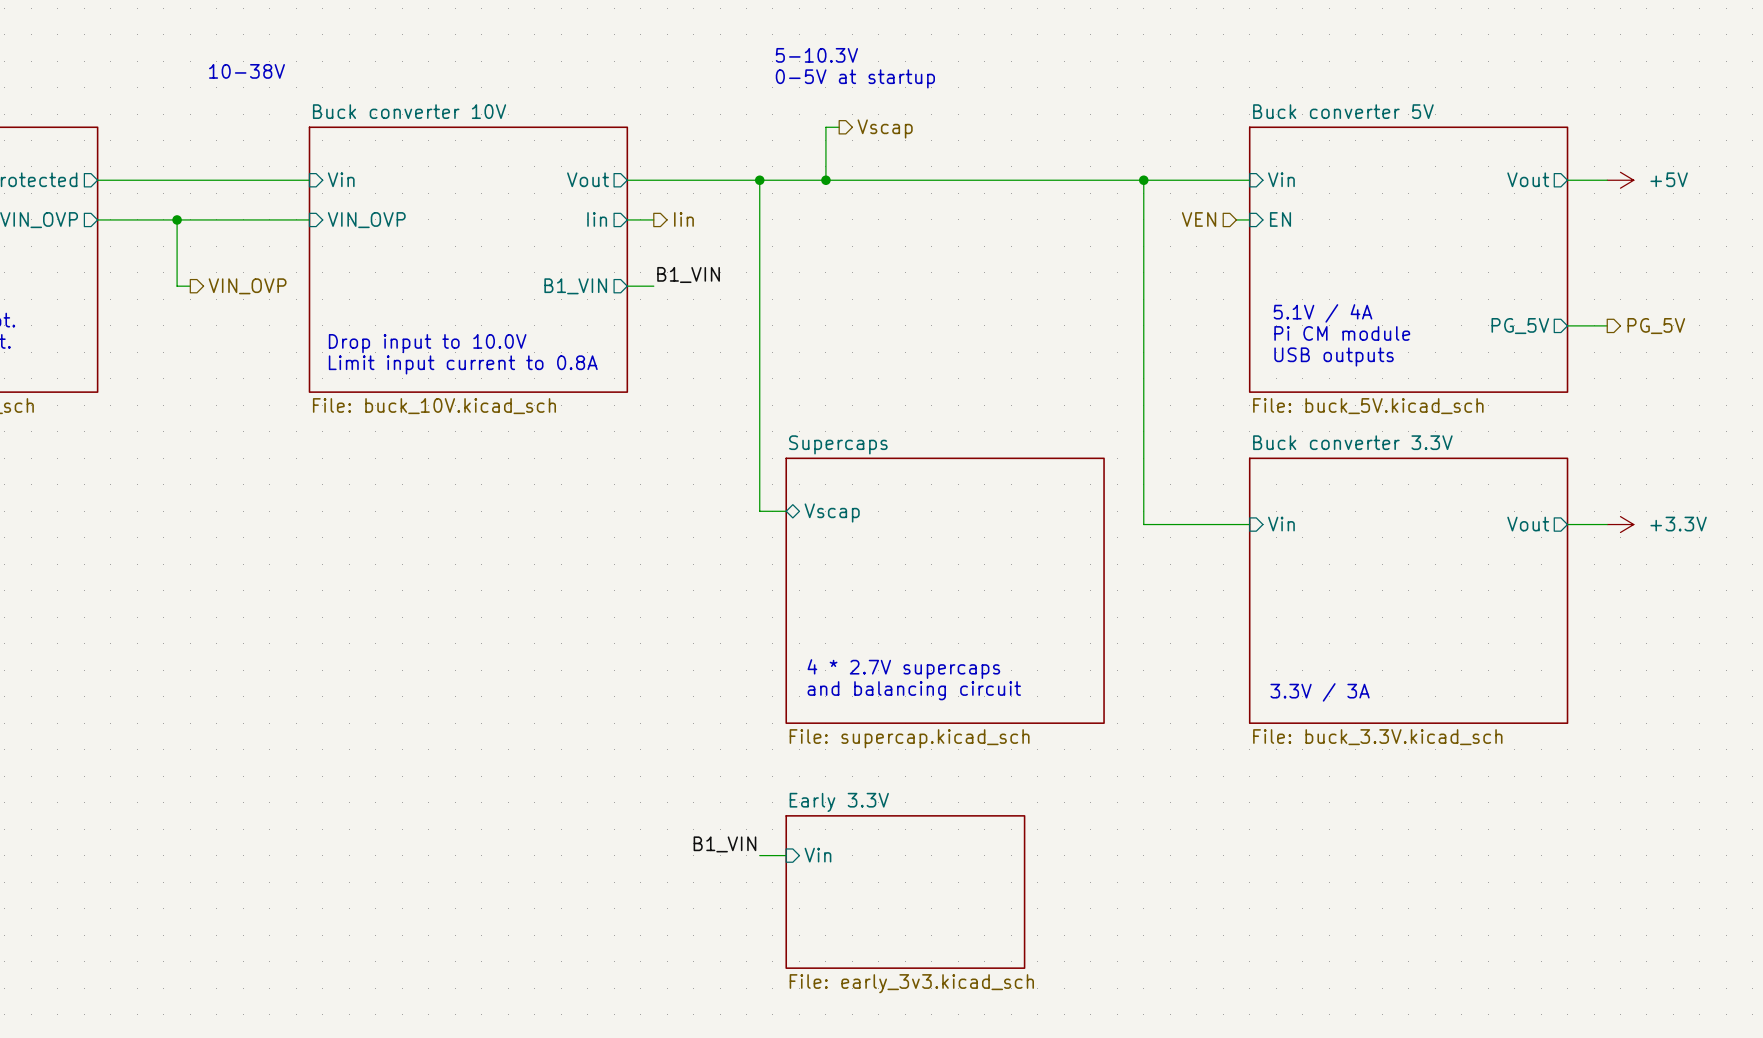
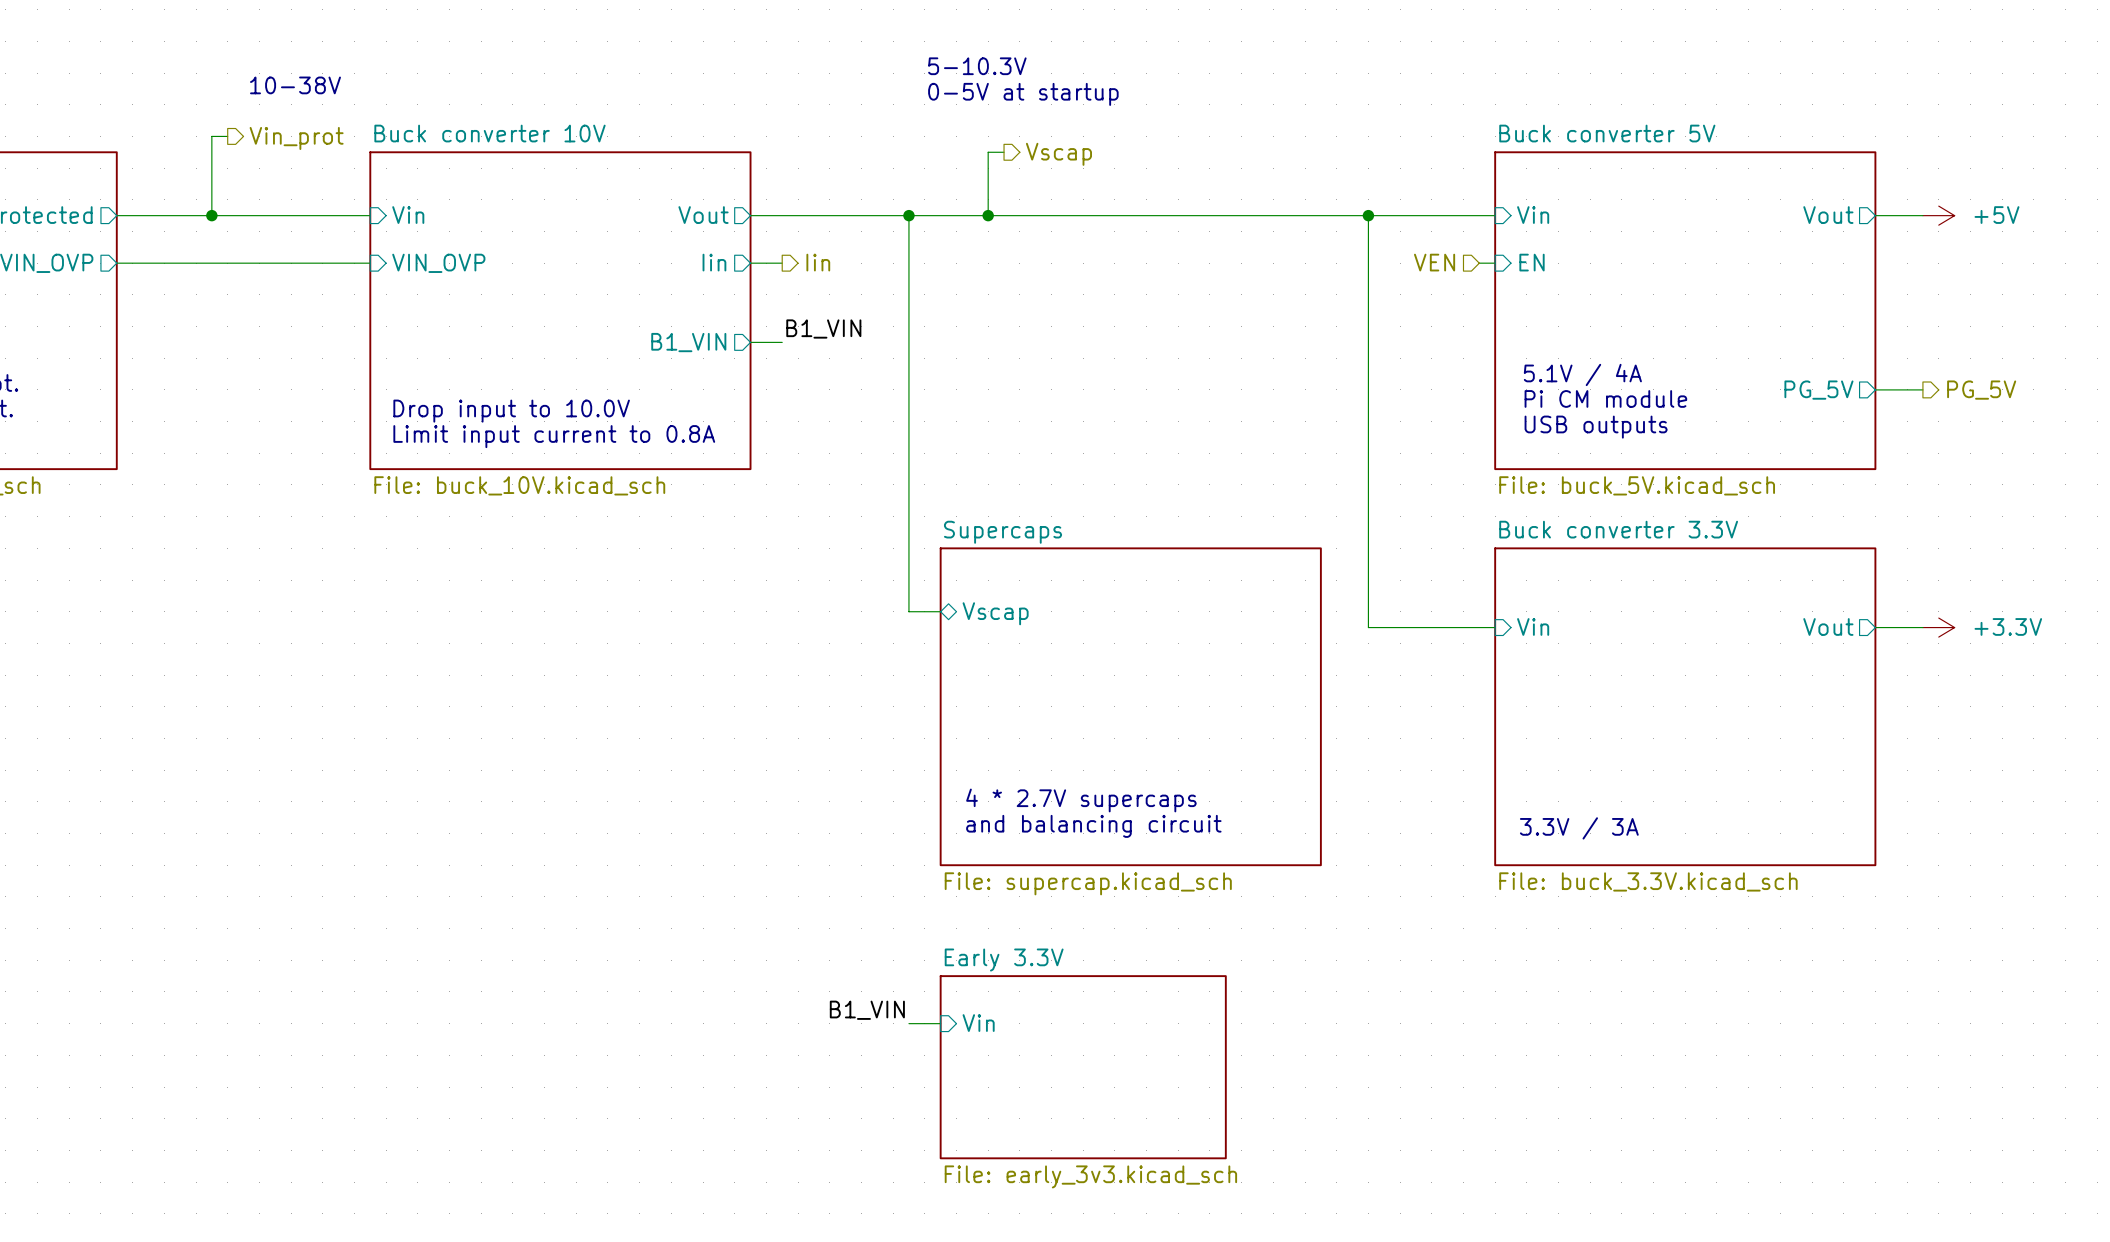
wire: none -> (227, 136) (211, 136) (211, 215)
hierarchical label: none -> Vin_prot (296, 138)
wire: (177, 219) (177, 286) (190, 286) -> none
junction position: (177, 219) -> (211, 215)
hierarchical label: VIN_OVP (247, 286) -> none

